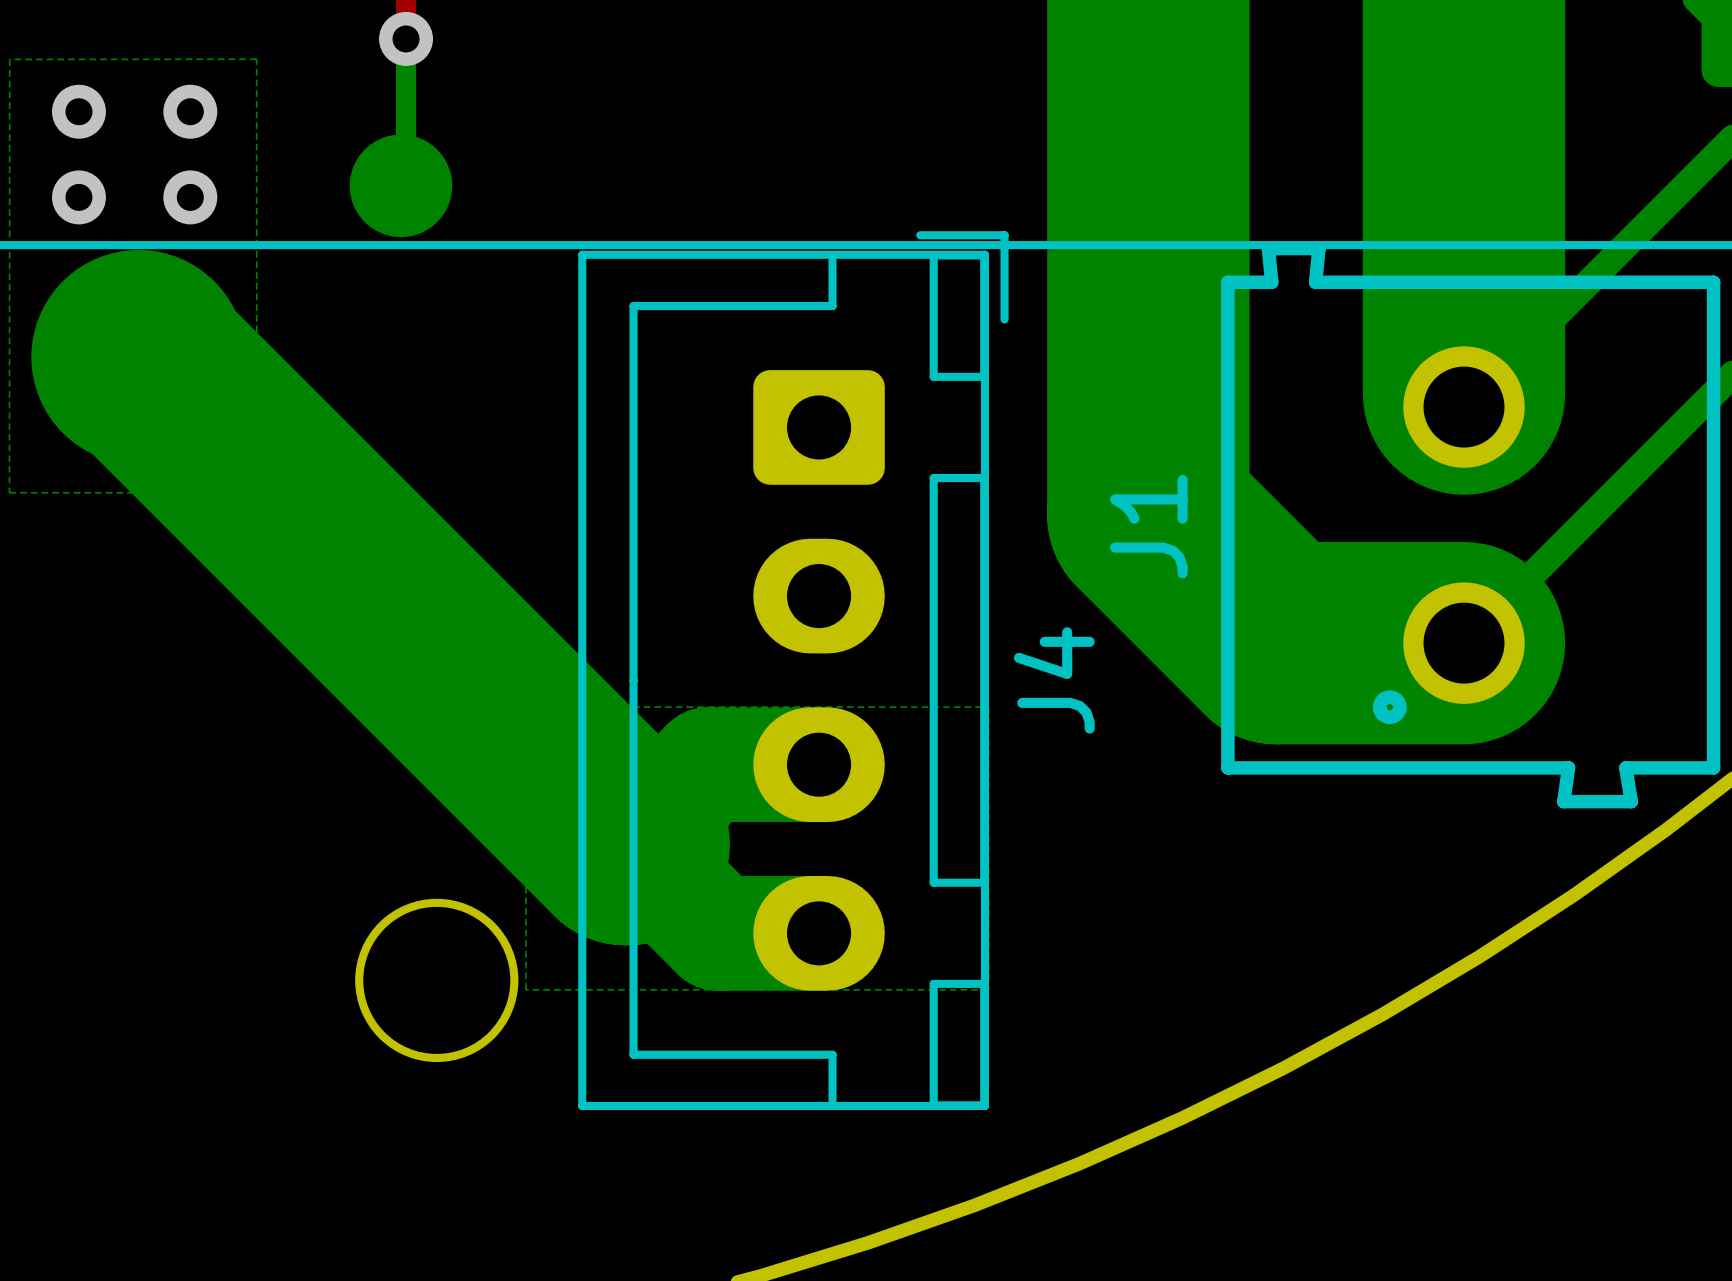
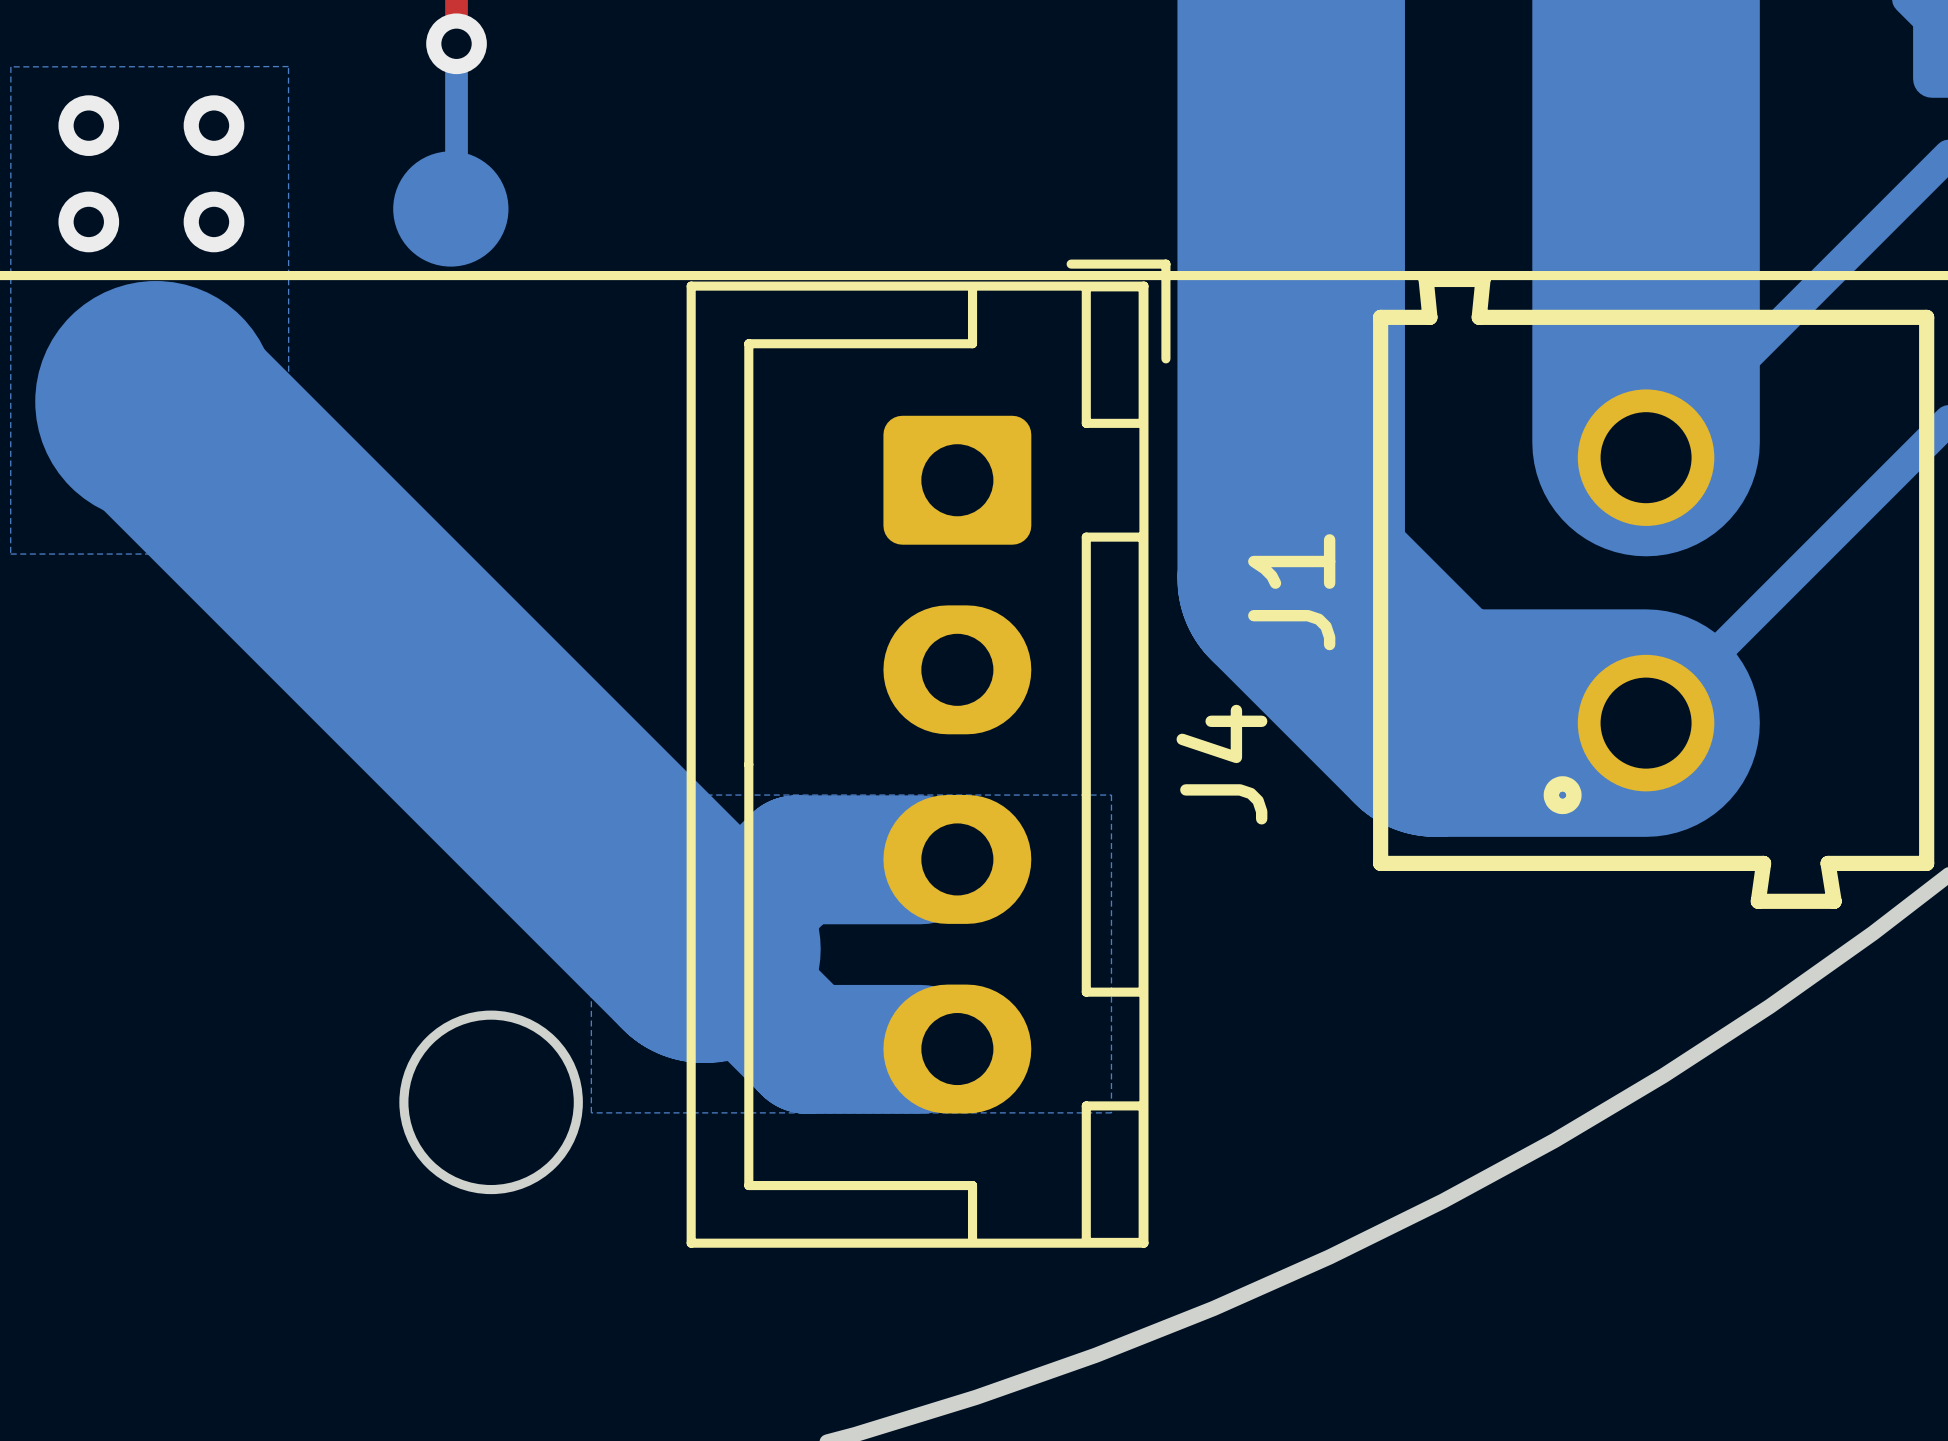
J4 position: (793, 670) -> (928, 753)

